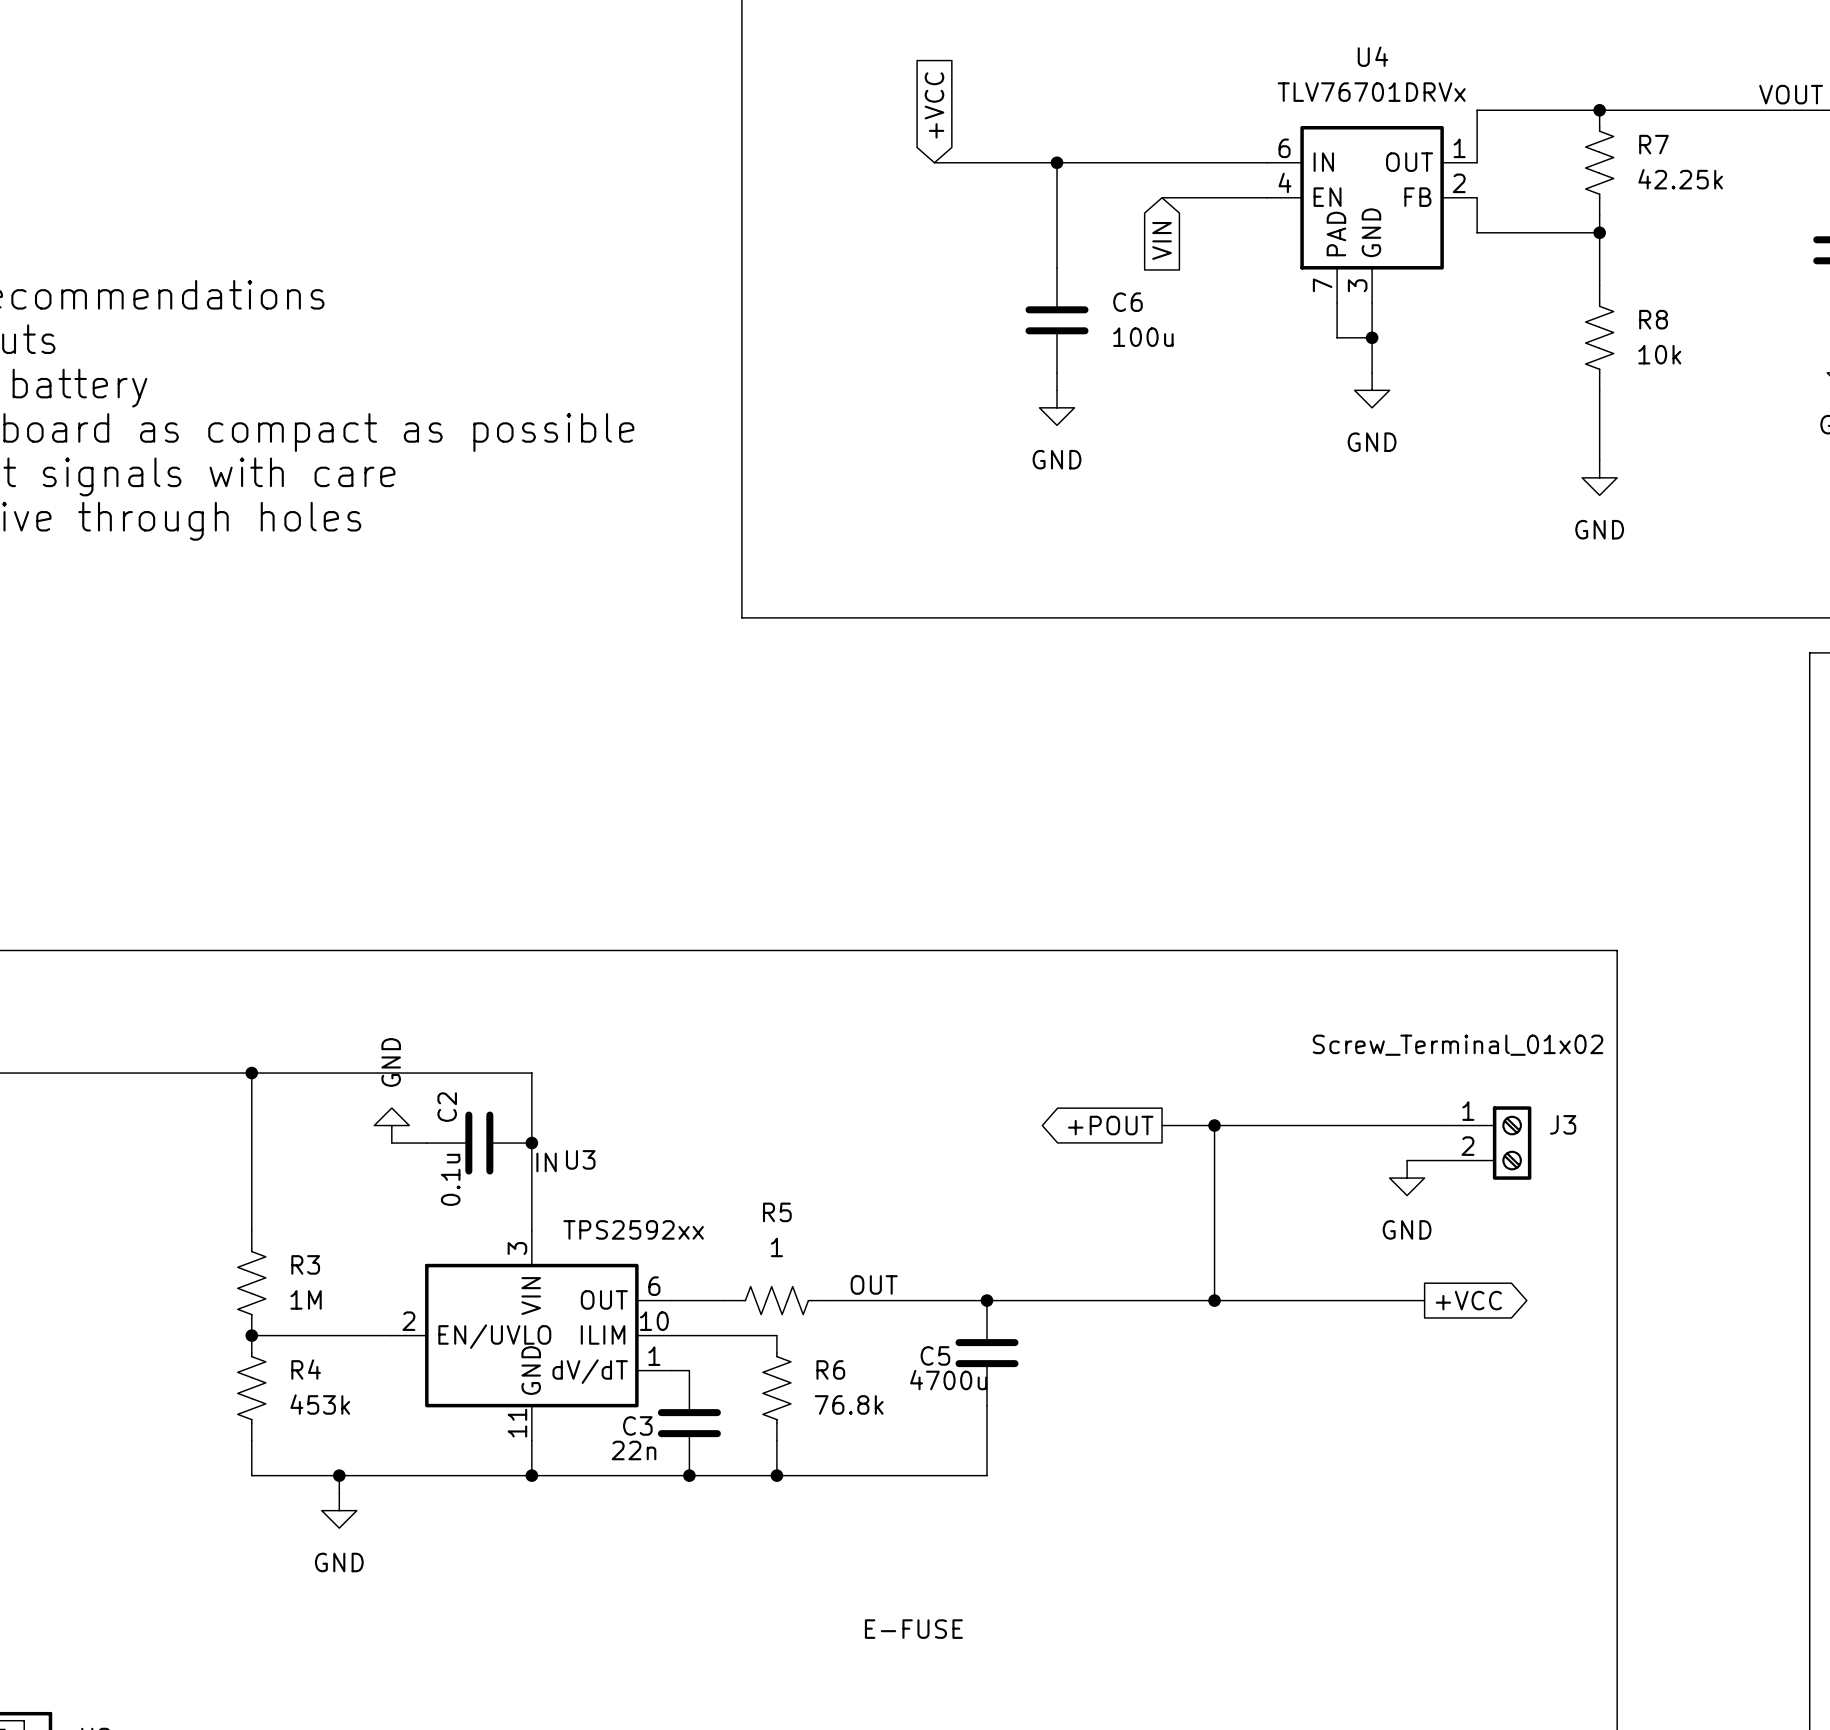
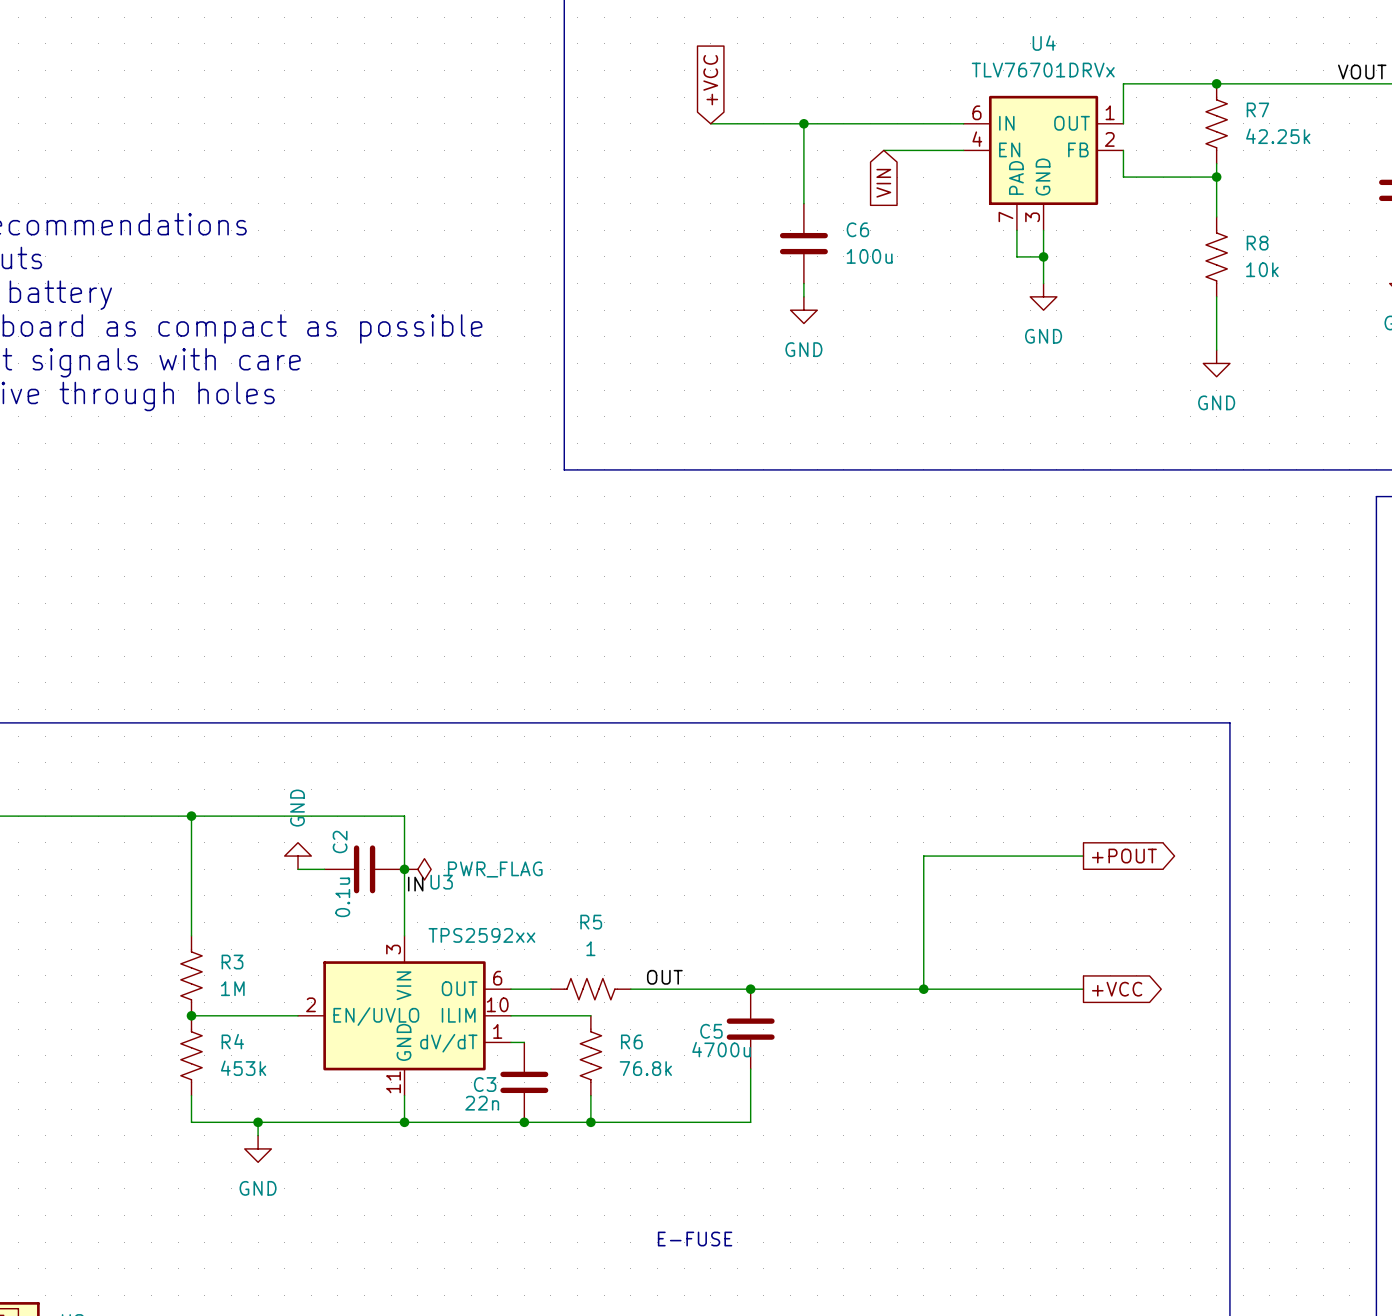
global label rotation: 0° (1110, 1125) -> 180° (1124, 856)
global label position: +POUT (1110, 1125) -> +POUT (1124, 856)
wire: (1162, 1125) (1214, 1125) -> none
junction: (1214, 1125) -> none
wire: (1424, 1125) (1442, 1125) -> none
power symbol: none -> PWR_FLAG (417, 869)
J3: Screw_Terminal_01x02 (1486, 1143) -> none
wire: (1407, 1160) (1442, 1160) -> none
power symbol: GND (1407, 1178) -> none

